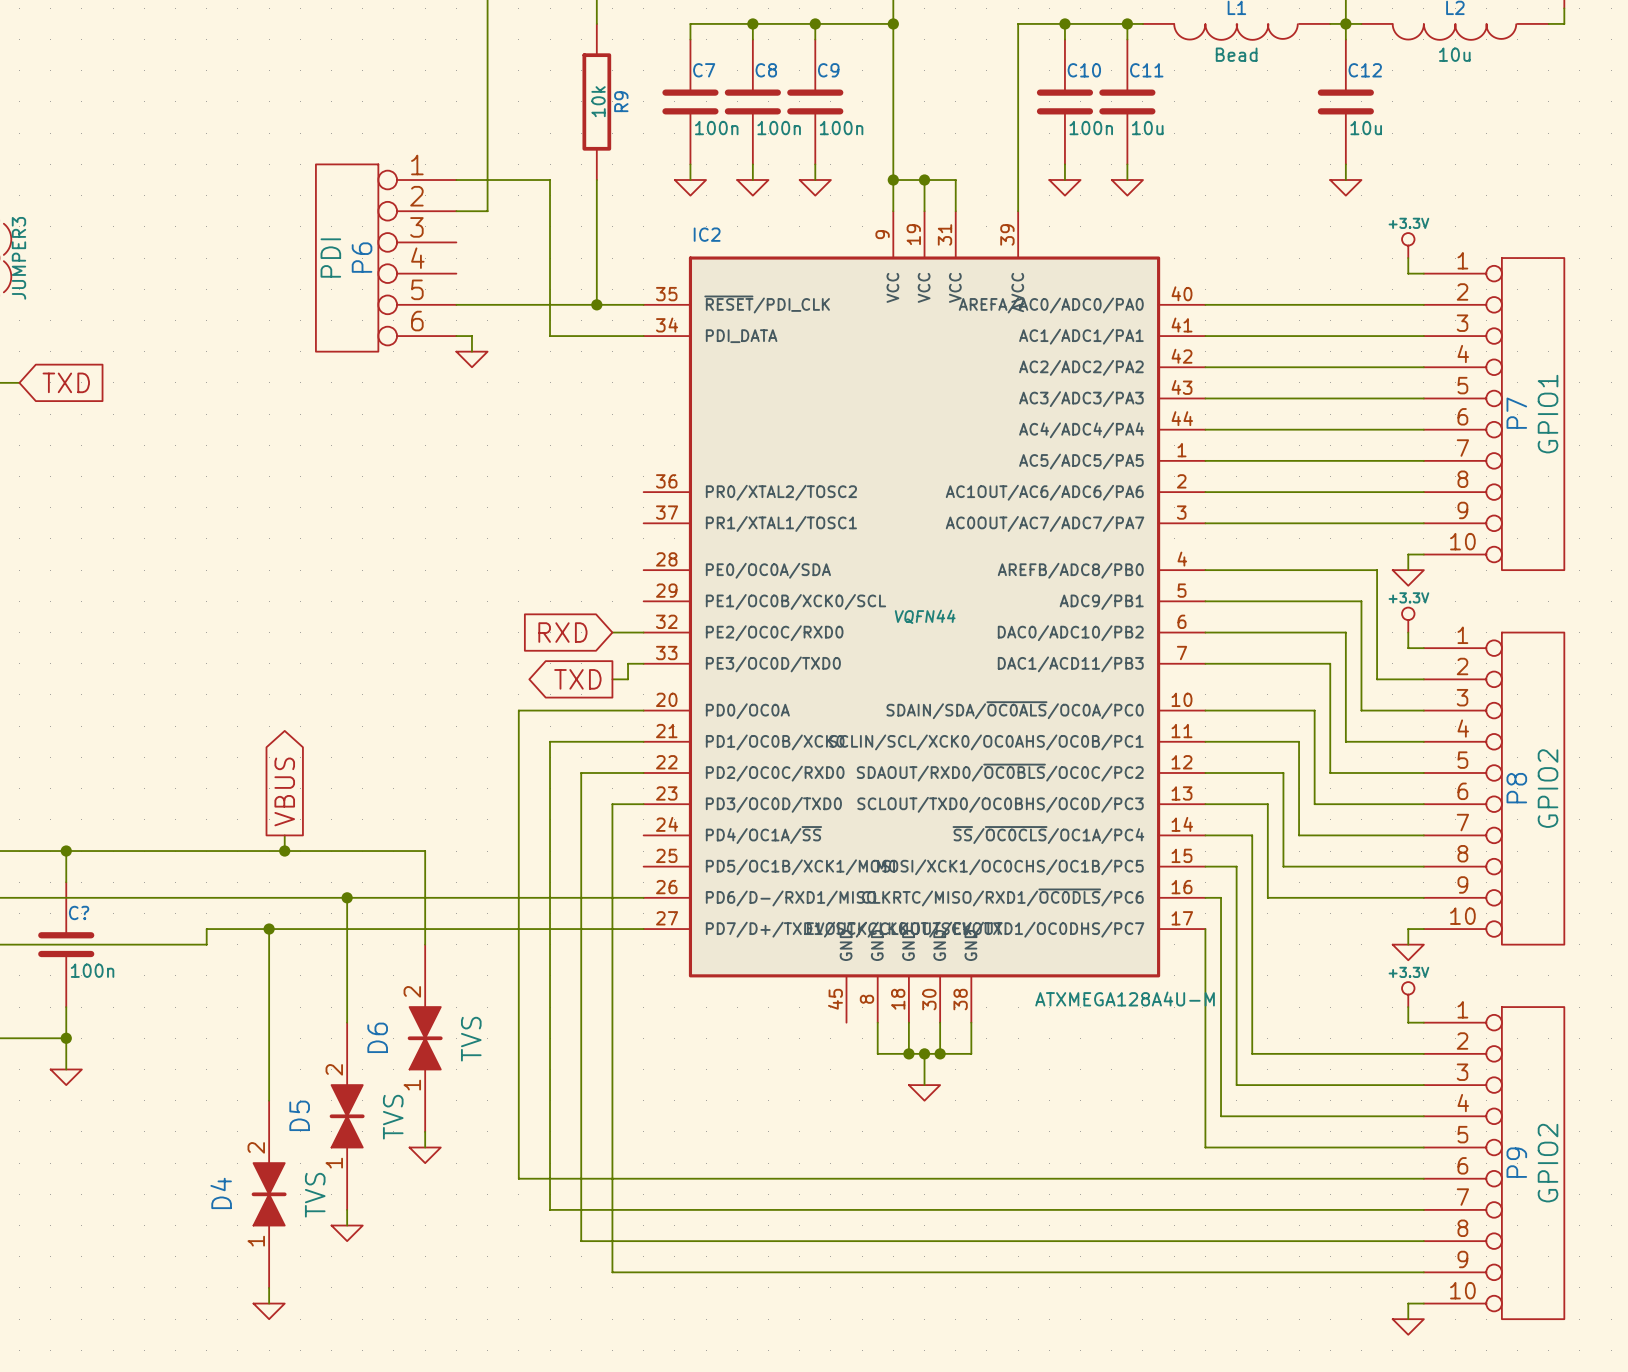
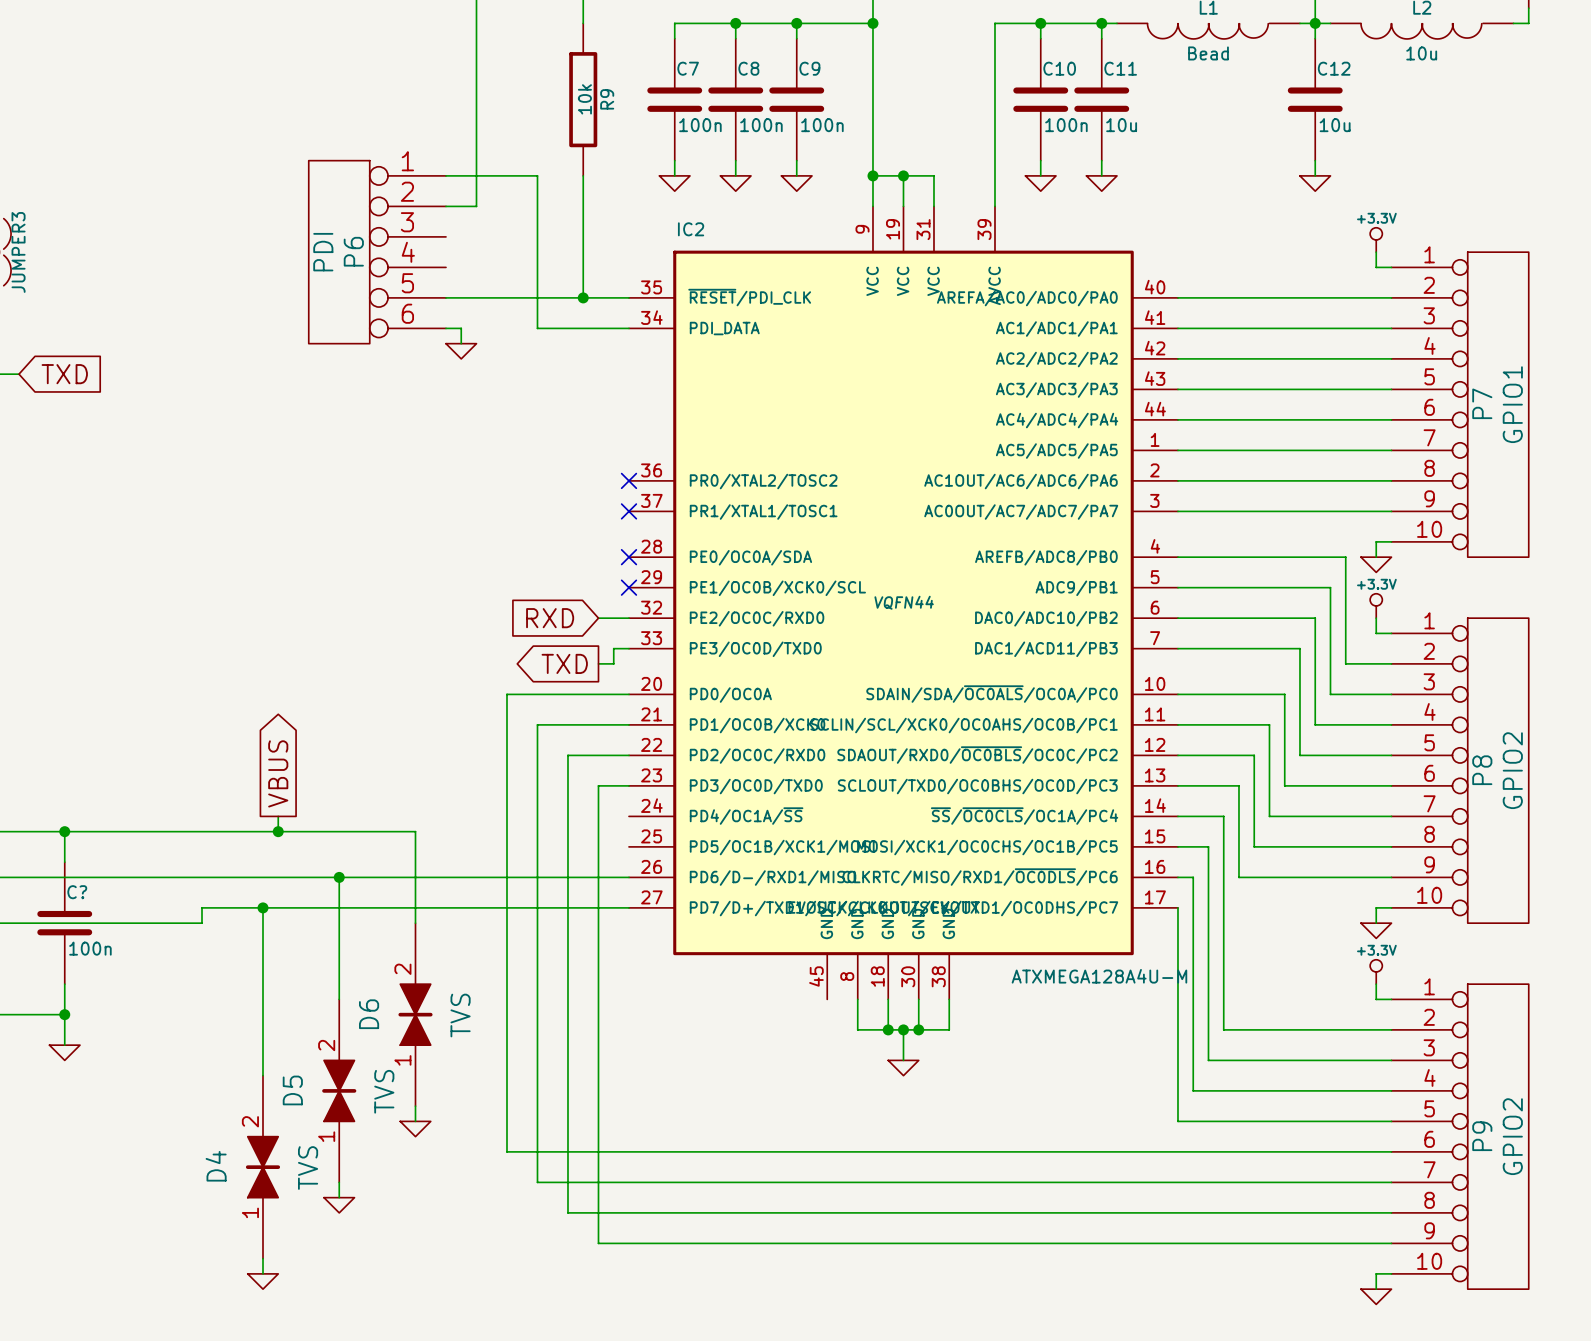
no-connect mark: none -> (628, 480)
no-connect mark: none -> (628, 511)
no-connect mark: none -> (628, 557)
no-connect mark: none -> (628, 587)

